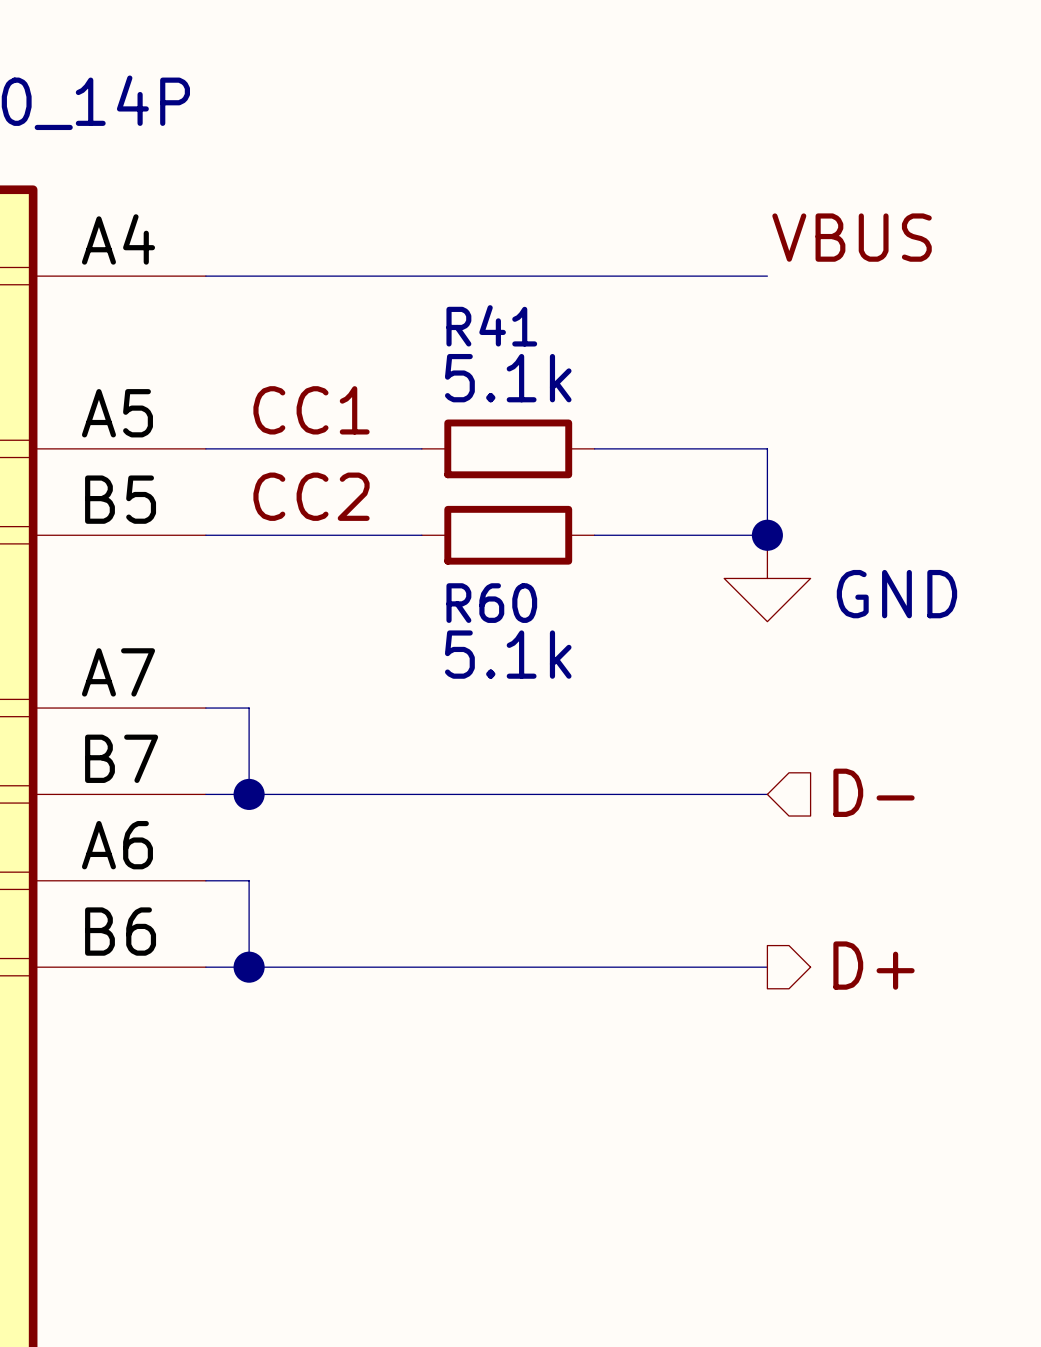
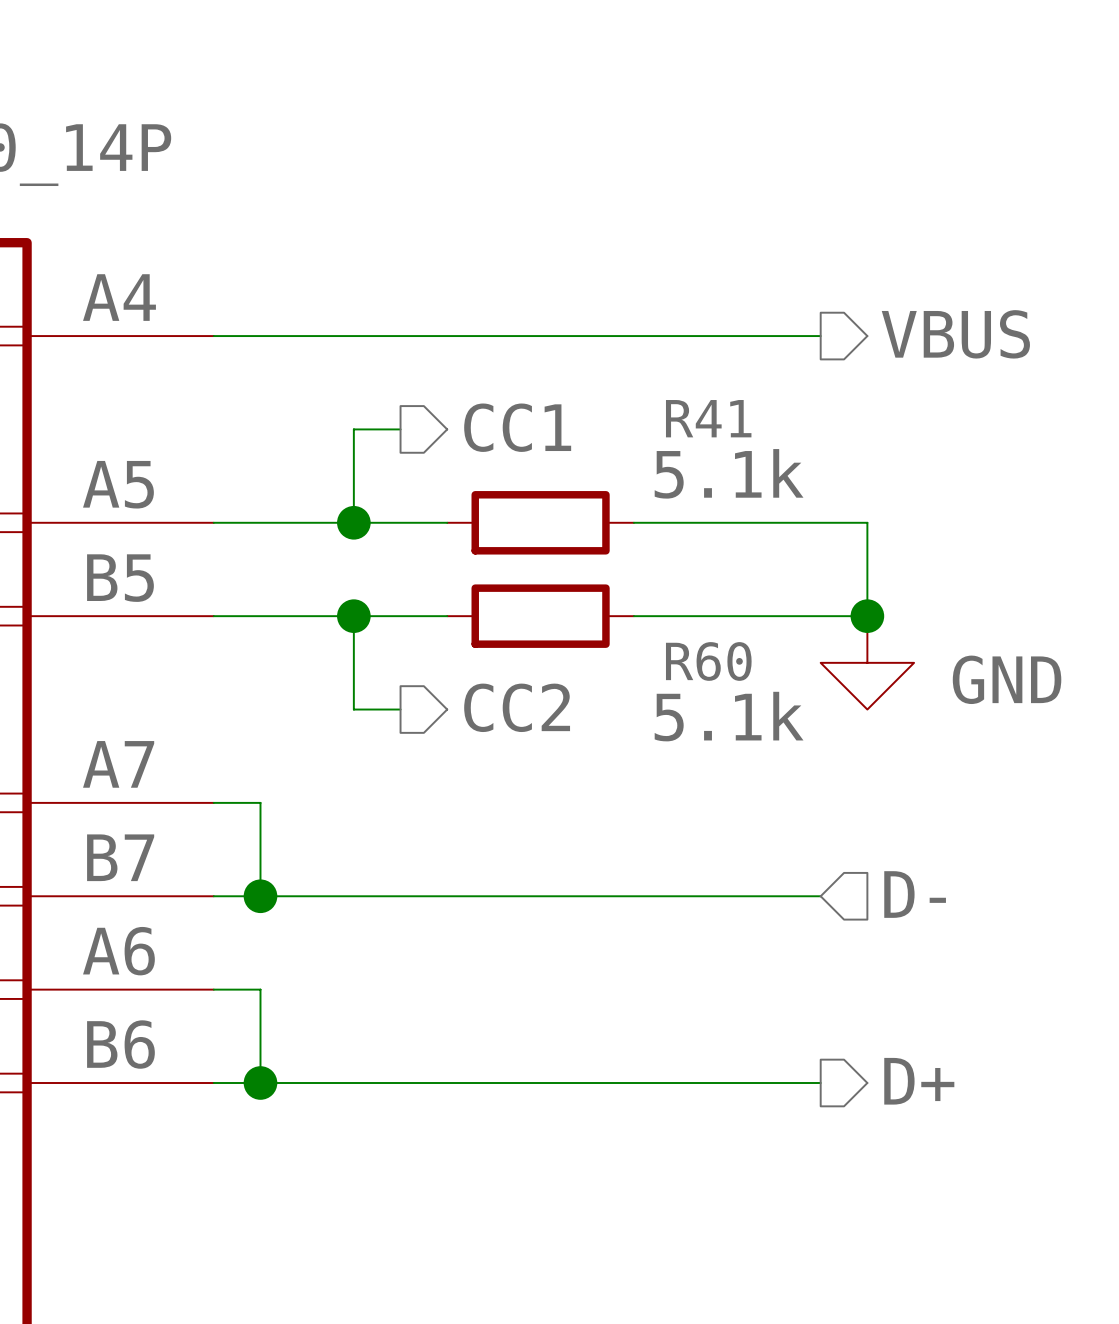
label: VBUS (852, 237) -> none
hierarchical label: none -> VBUS (955, 334)
R41 name position: R41 (491, 325) -> R41 (708, 418)
hierarchical label: none -> CC1 (517, 427)
wire: none -> (400, 429) (353, 429) (353, 522)
R41 value position: 5.1k (508, 378) -> 5.1k (729, 473)
label: CC1 (311, 410) -> none
junction: none -> (353, 522)
wire: (767, 448) (767, 535) -> (820, 522) (867, 522) (867, 616) (820, 616)
label: CC2 (311, 496) -> none
wire: none -> (353, 616) (353, 709) (400, 709)
junction: none -> (353, 616)
junction position: (767, 535) -> (867, 616)
power symbol position: GND (767, 578) -> GND (867, 662)
R60 name position: R60 (491, 603) -> R60 (708, 661)
hierarchical label: none -> CC2 (517, 707)
R60 value position: 5.1k (508, 654) -> 5.1k (729, 716)

